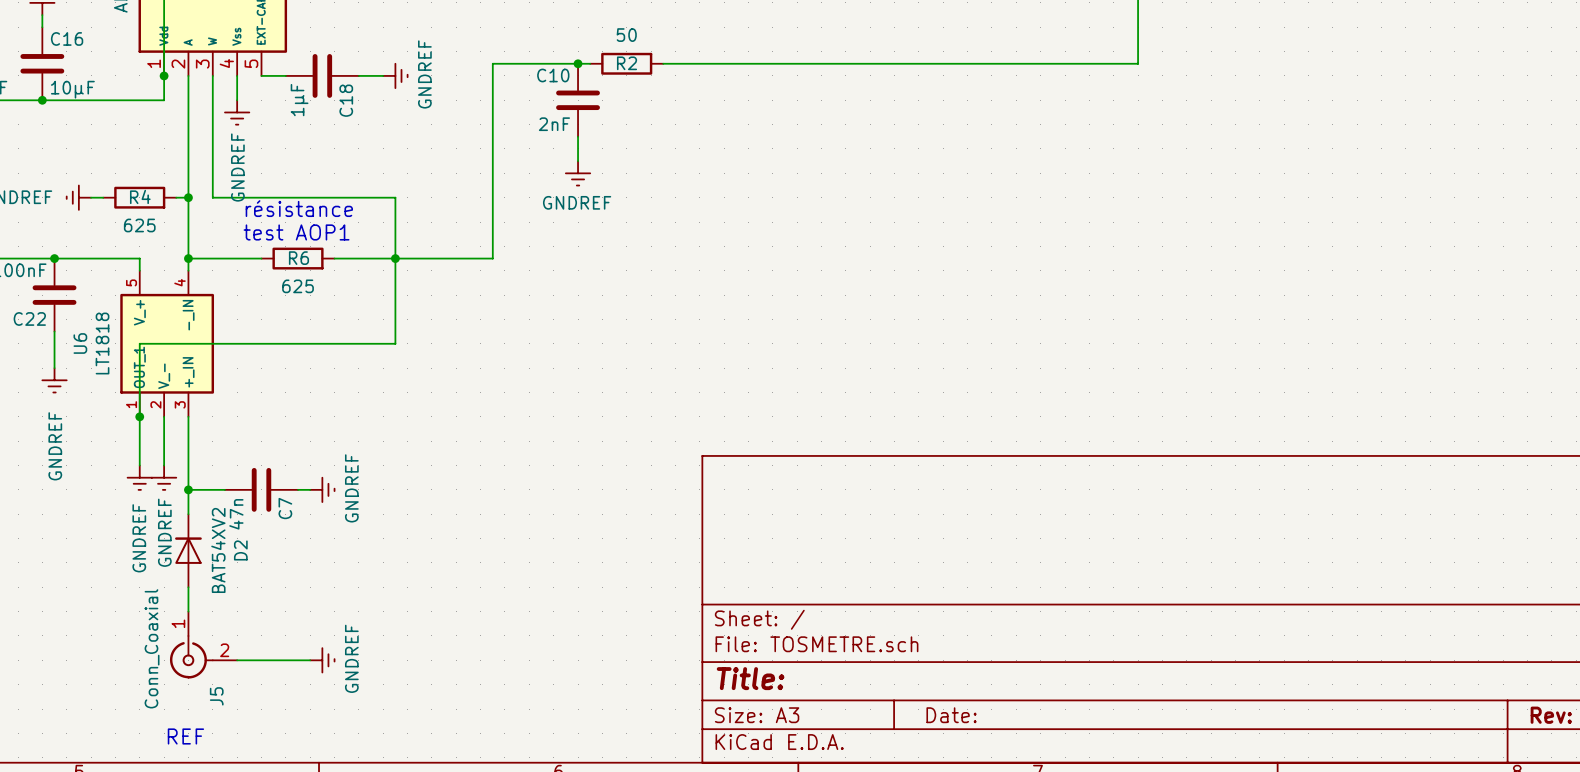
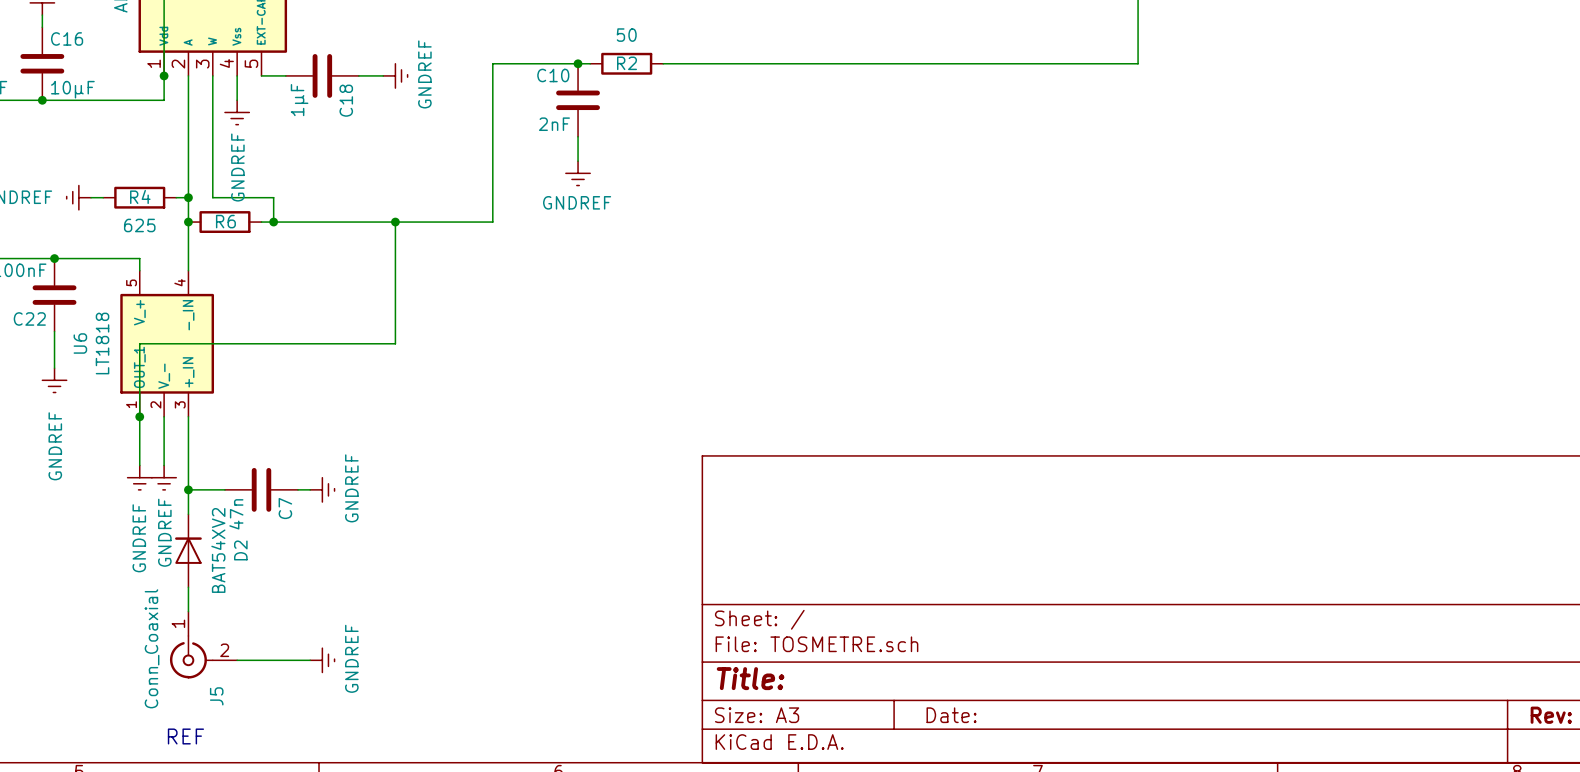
wire: (273, 197) (395, 197) (395, 222) -> (273, 197) (273, 222)
text: résistance (299, 208) -> none
junction: none -> (273, 222)
wire: (492, 222) (492, 258) (334, 258) -> (492, 222) (261, 222)
text: test AOP1 (296, 232) -> none
wire: (188, 258) (261, 258) -> none
junction position: (188, 258) -> (188, 222)
R6 position: (298, 258) -> (224, 222)
junction position: (395, 258) -> (395, 222)
R6 value: 625 (298, 286) -> none

